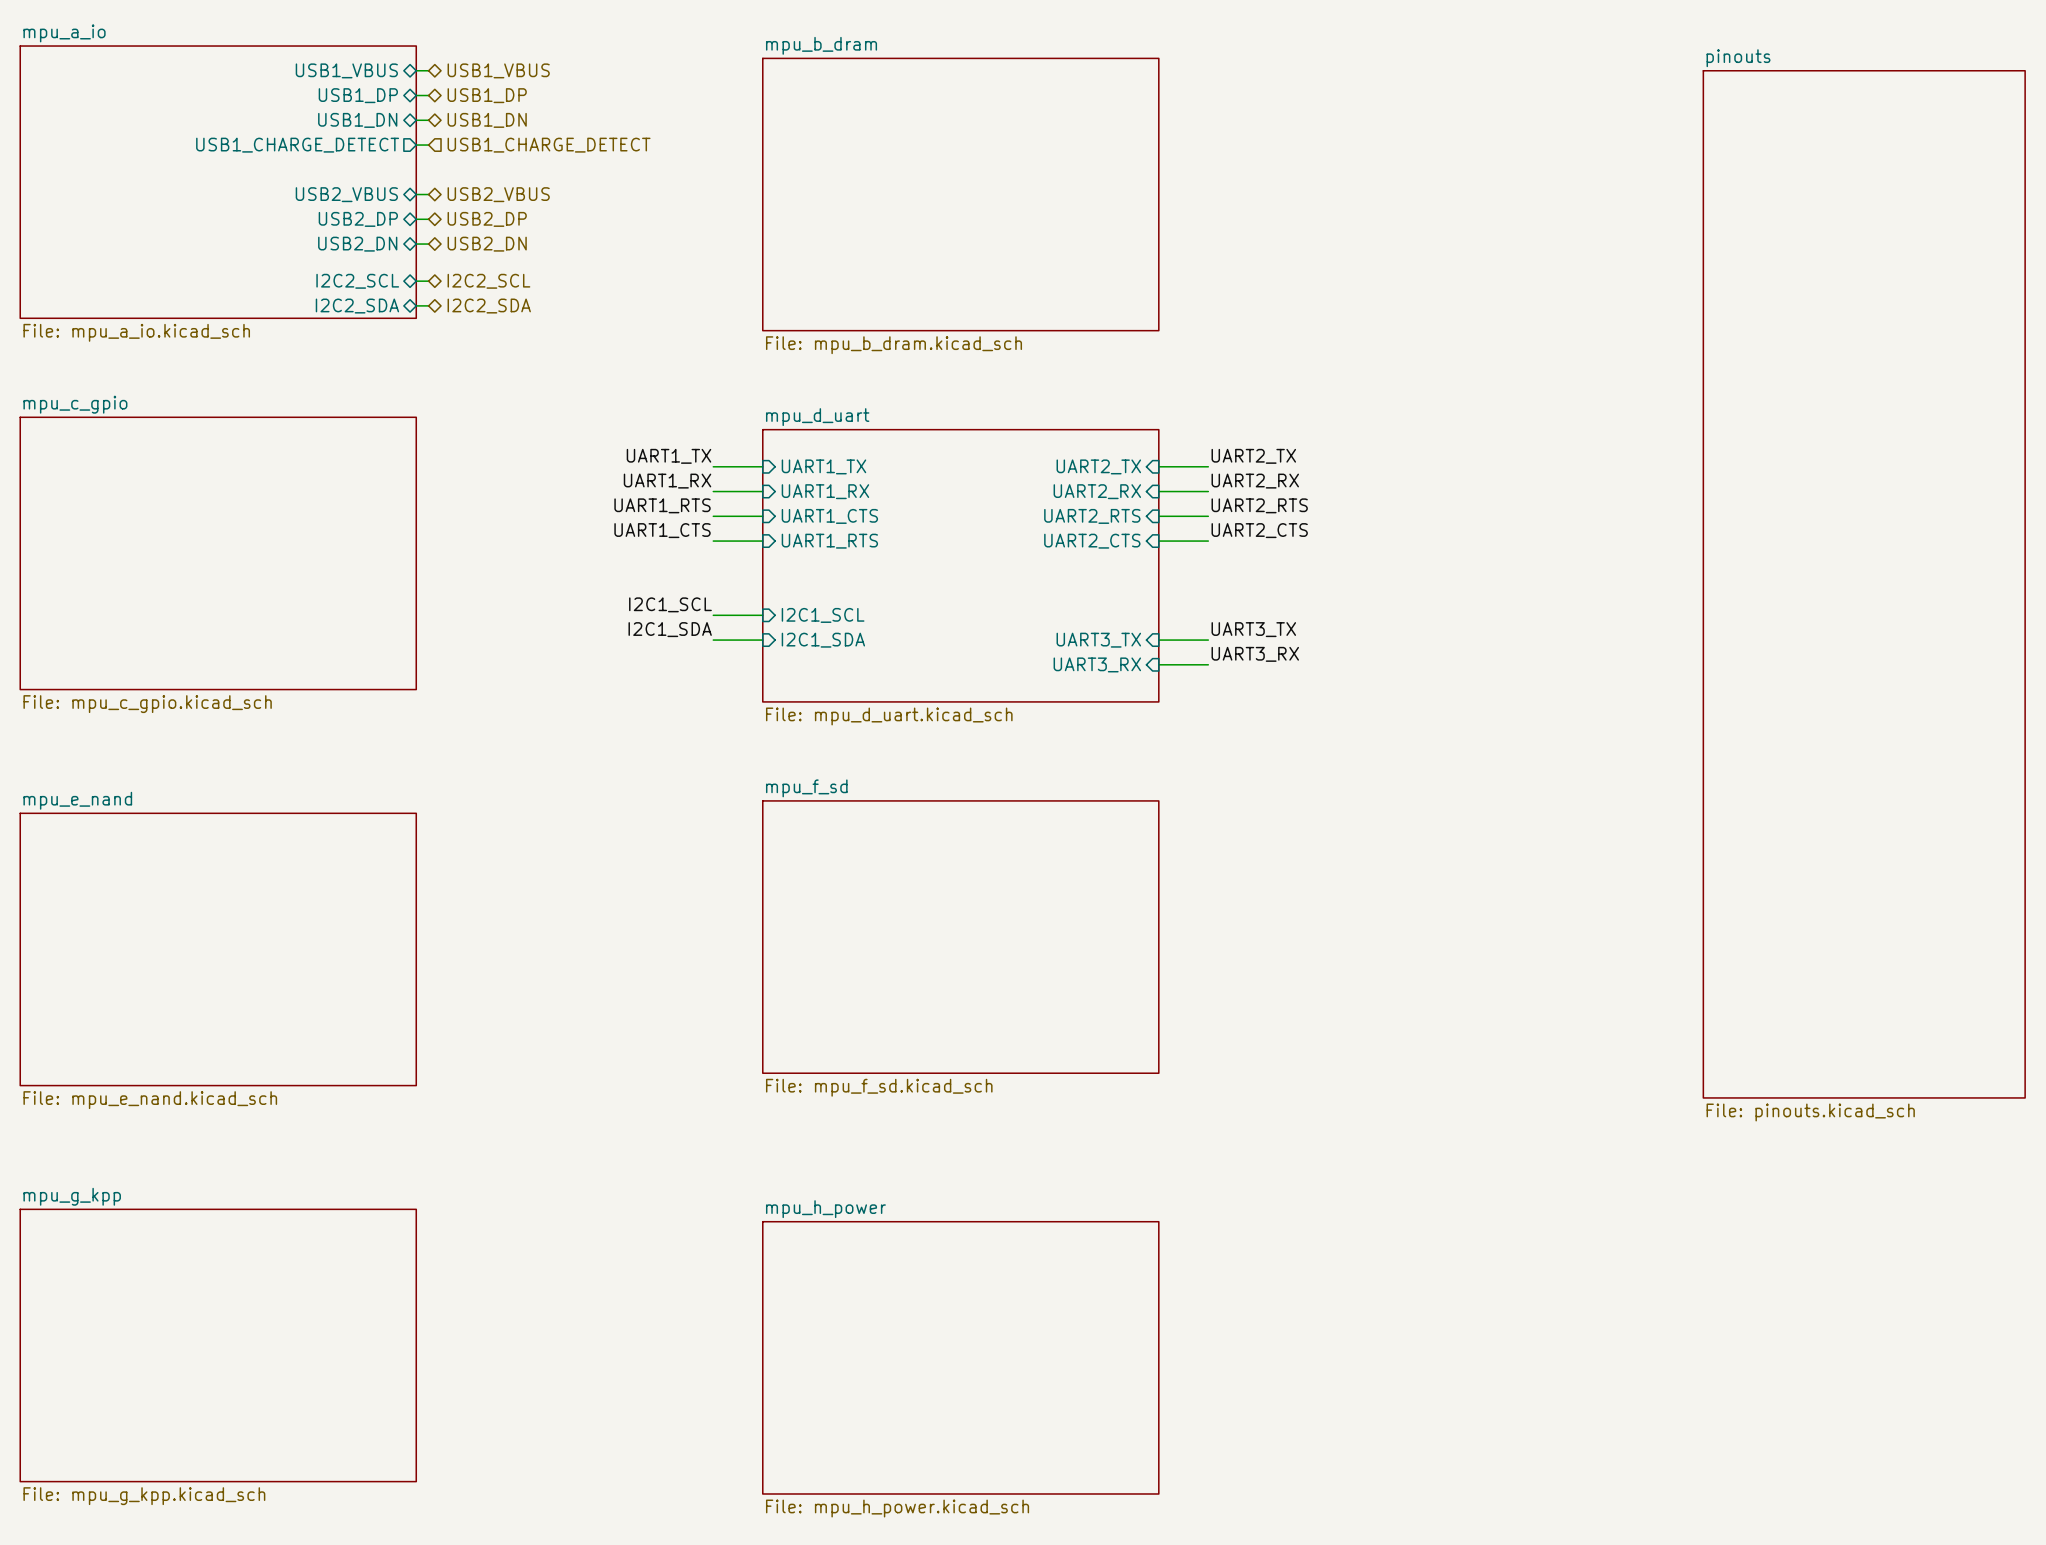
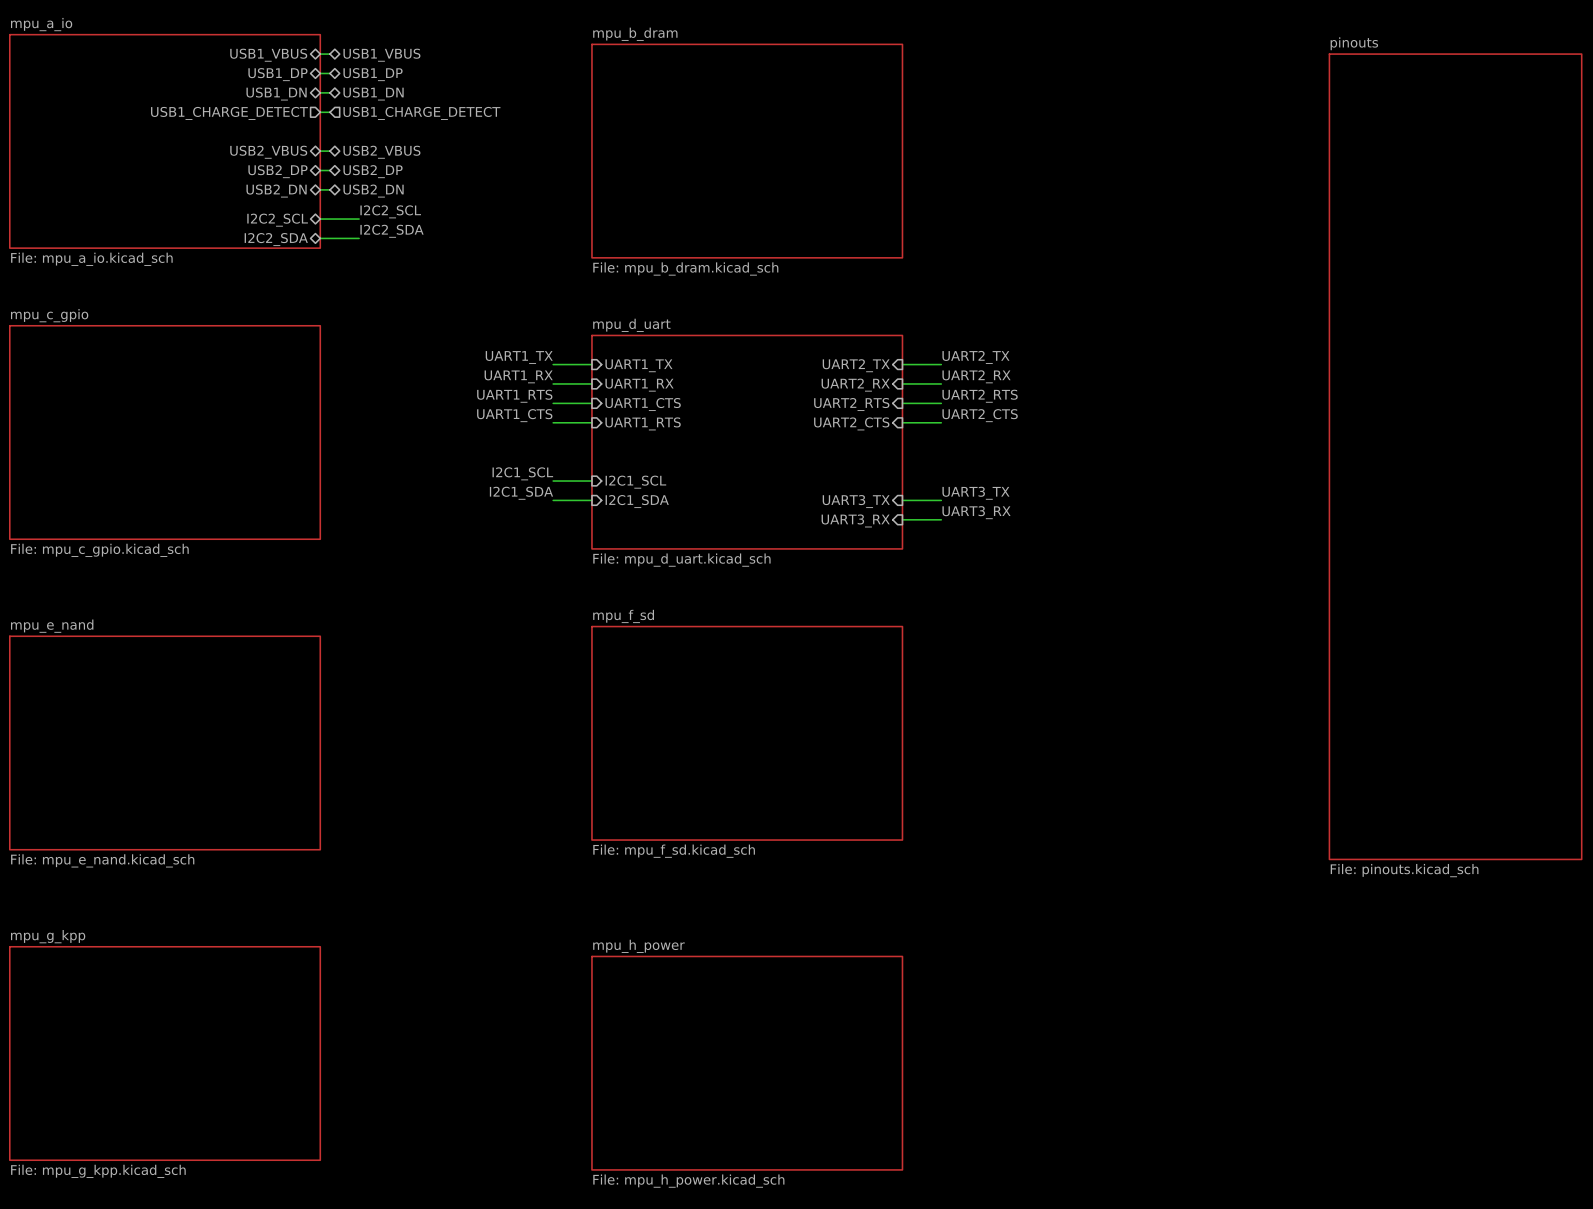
label: none -> I2C2_SCL (390, 211)
wire: none -> (329, 219) (359, 219)
hierarchical label: I2C2_SCL (488, 281) -> none
label: none -> I2C2_SDA (392, 231)
wire: none -> (329, 238) (359, 238)
hierarchical label: I2C2_SDA (489, 306) -> none

